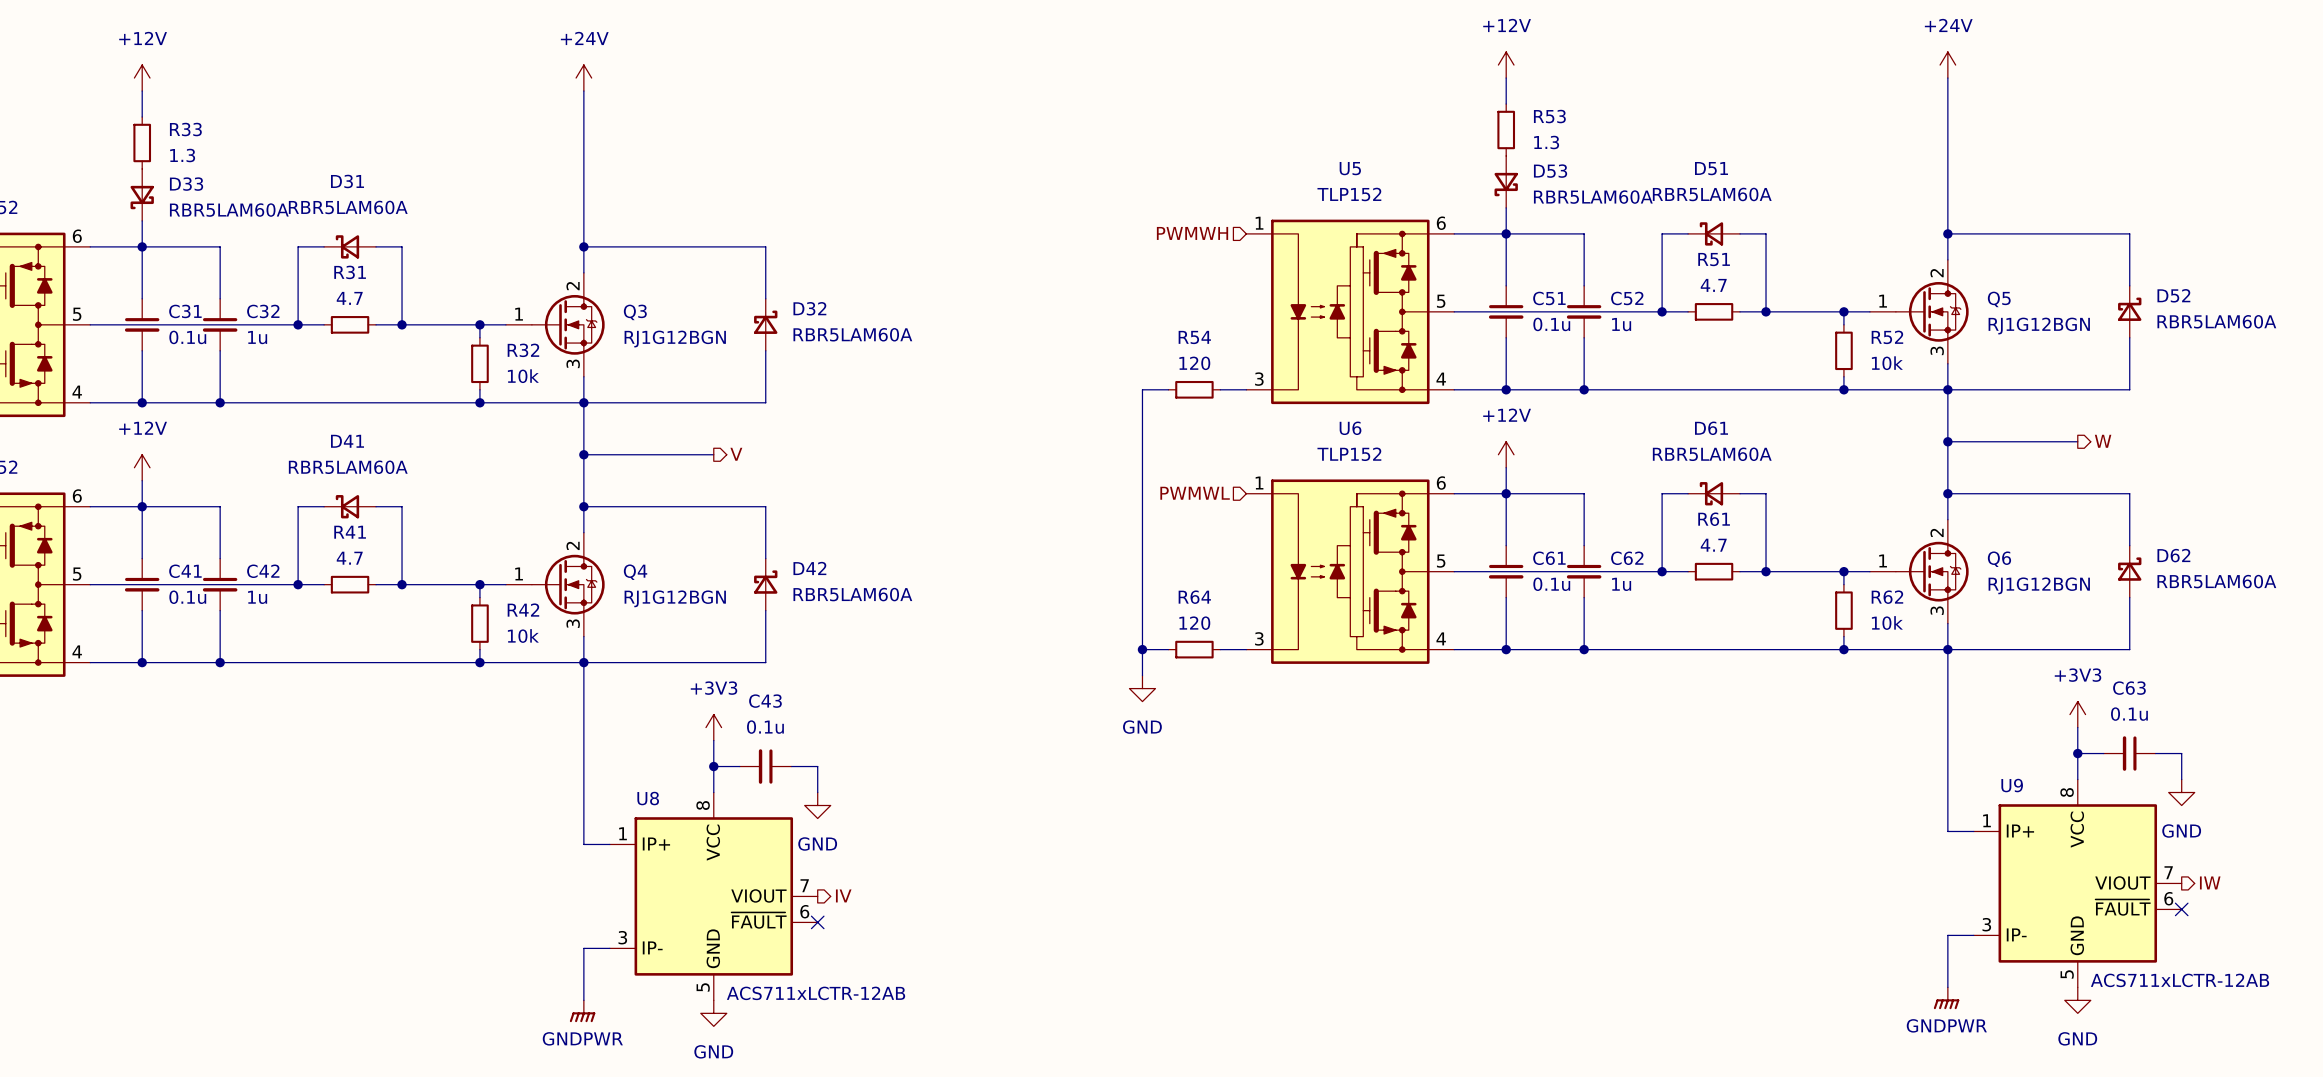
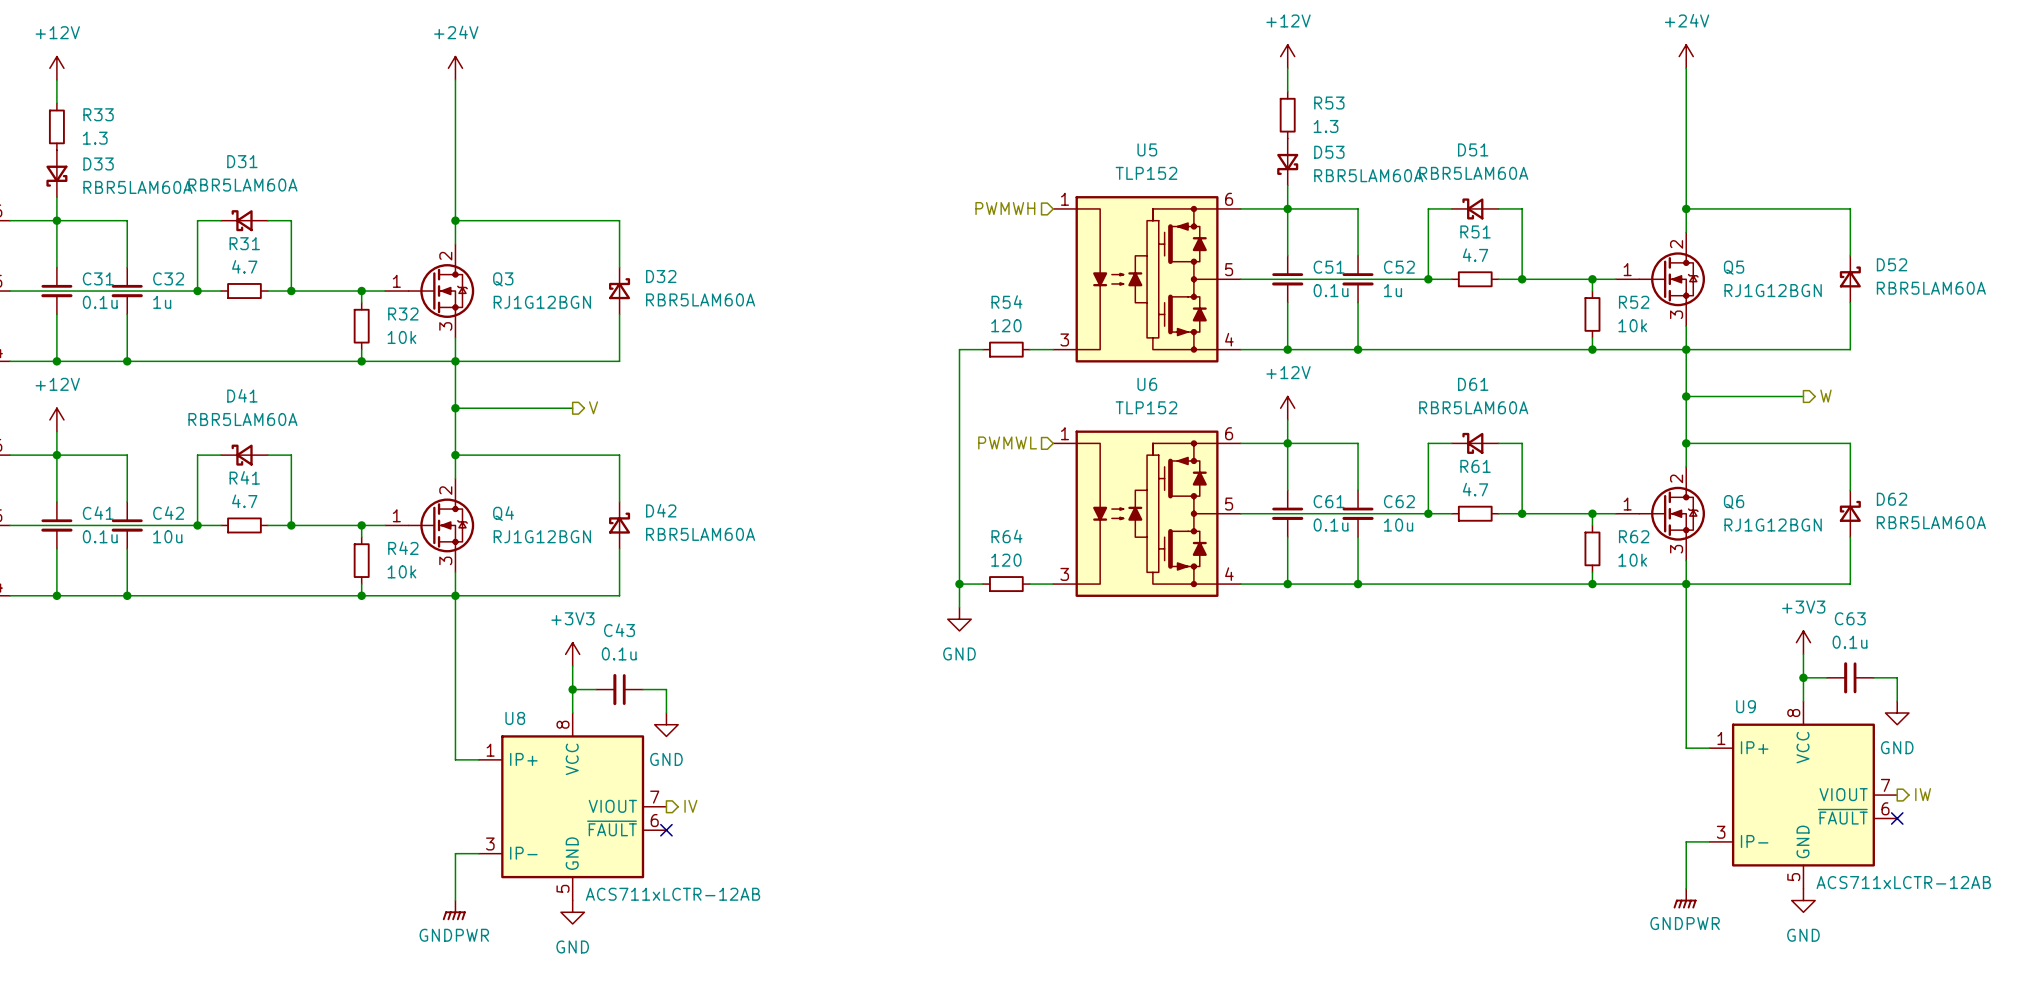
C62 value: 1u (1621, 584) -> 10u (1398, 525)
C42 value: 1u (257, 597) -> 10u (167, 536)

